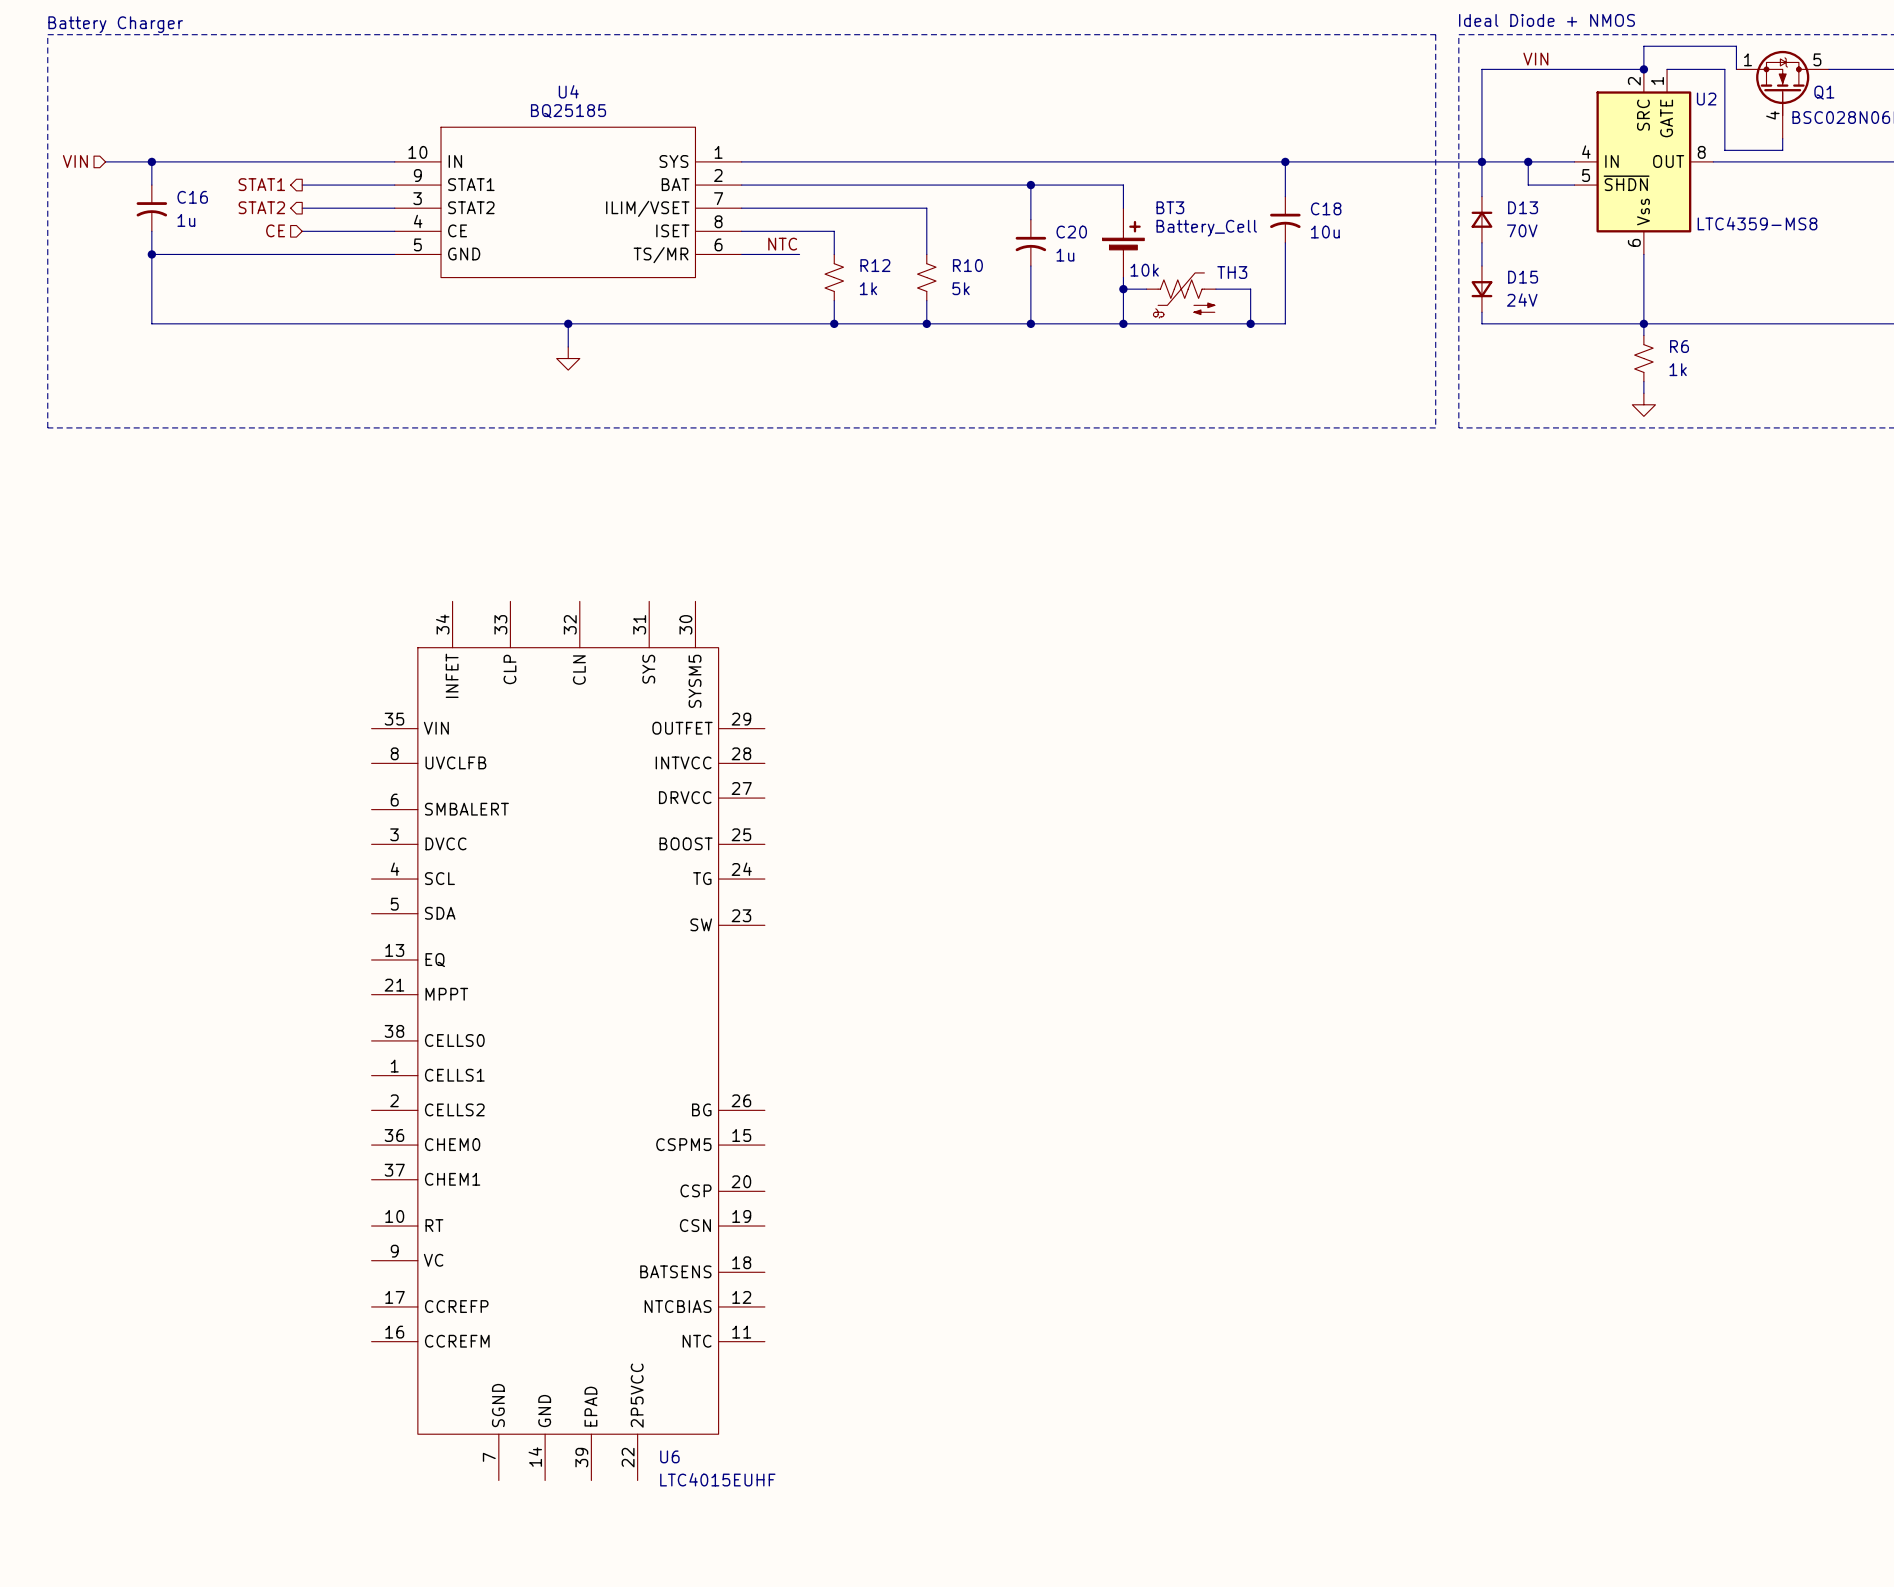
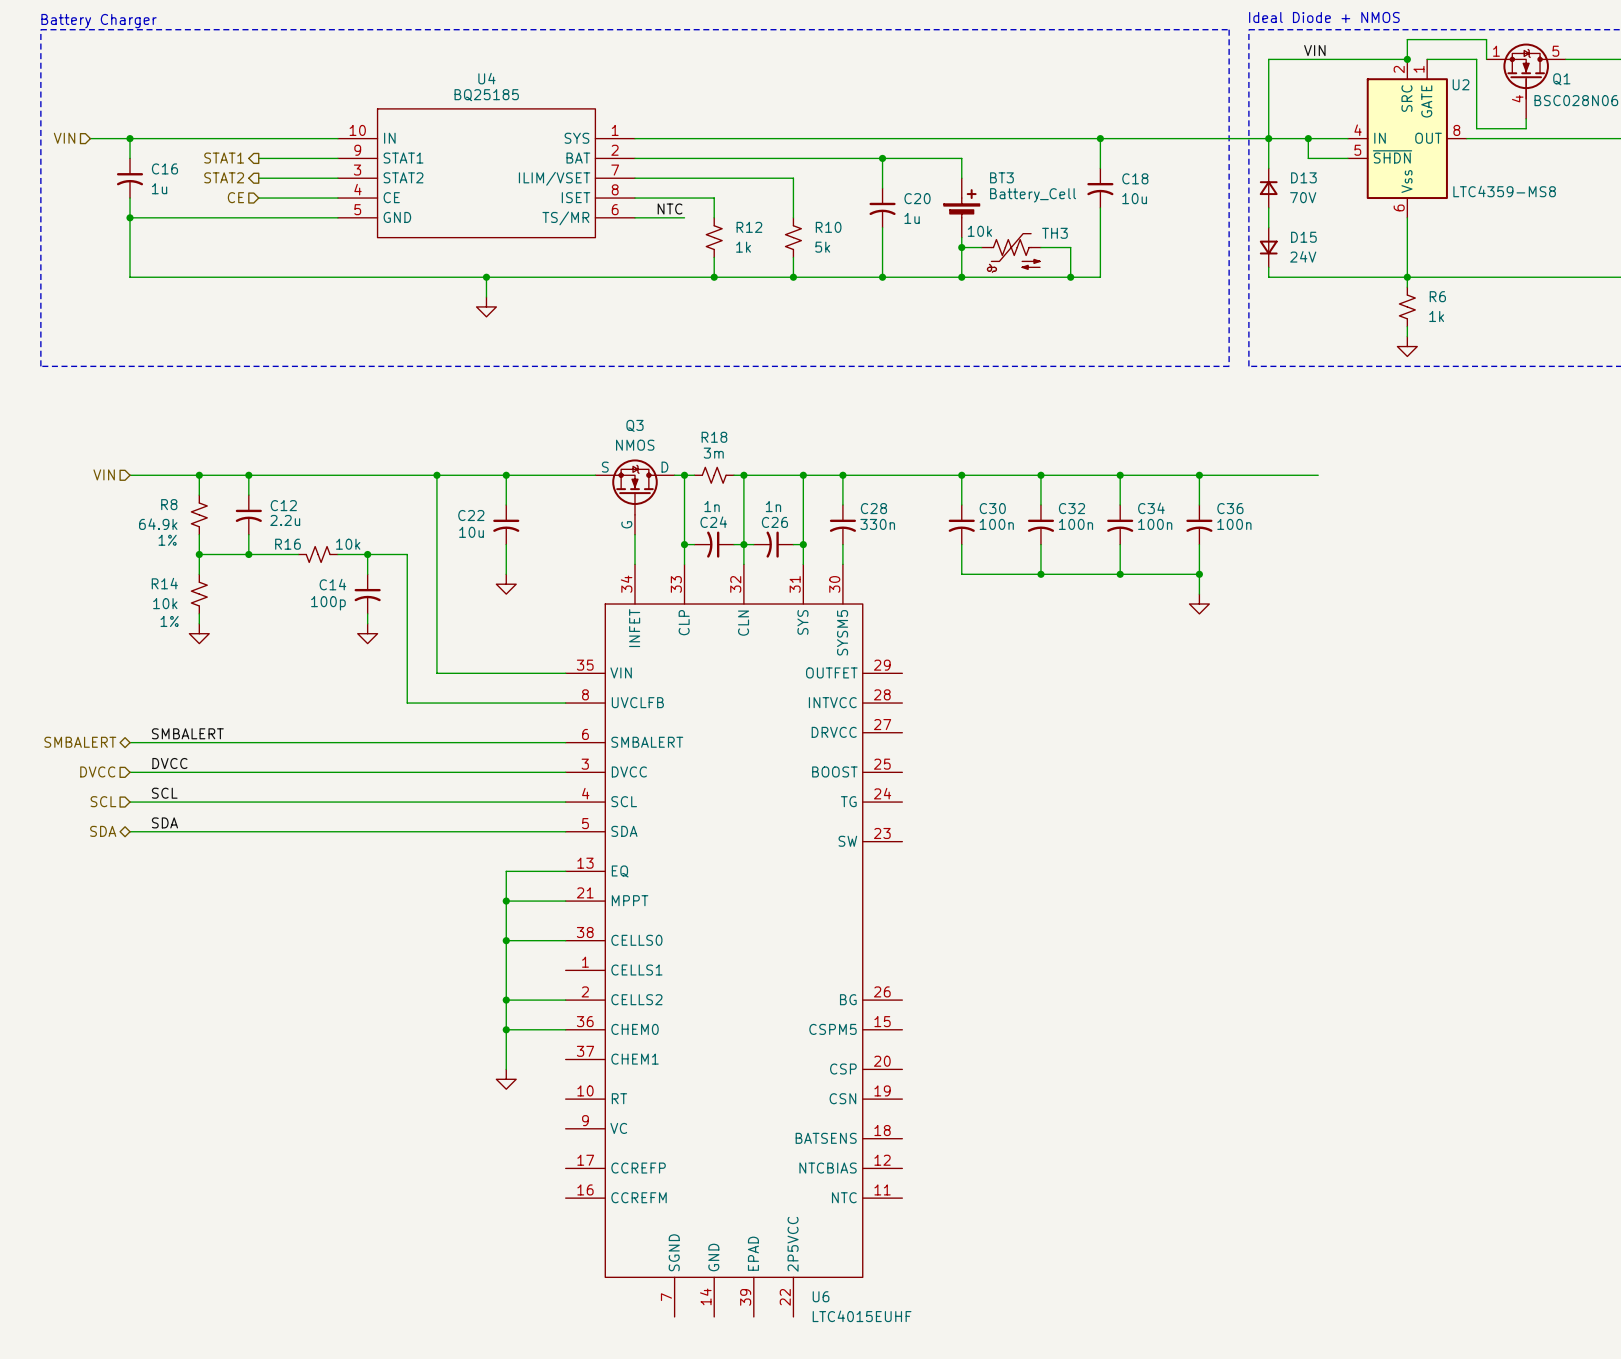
hierarchical label: none -> VIN (104, 474)
wire: none -> (130, 475) (595, 475)
wire: none -> (199, 475) (199, 495)
junction: none -> (199, 475)
wire: none -> (248, 475) (248, 495)
junction: none -> (248, 475)
wire: none -> (436, 475) (436, 673) (565, 673)
junction: none -> (436, 475)
wire: none -> (506, 475) (506, 504)
junction: none -> (506, 475)
wire: none -> (674, 475) (694, 475)
wire: none -> (684, 475) (684, 564)
junction: none -> (684, 475)
R18: none -> 3m (714, 475)
wire: none -> (734, 475) (1318, 475)
wire: none -> (743, 475) (743, 564)
junction: none -> (743, 475)
wire: none -> (803, 475) (803, 564)
junction: none -> (803, 475)
wire: none -> (842, 475) (842, 504)
junction: none -> (842, 475)
wire: none -> (961, 475) (961, 504)
junction: none -> (961, 475)
wire: none -> (1040, 475) (1040, 504)
junction: none -> (1040, 475)
wire: none -> (1120, 475) (1120, 504)
junction: none -> (1120, 475)
wire: none -> (1199, 475) (1199, 504)
junction: none -> (1199, 475)
Q3: none -> NMOS (634, 497)
R8: none -> 64.9k (199, 514)
C12: none -> 2.2u (248, 514)
C22: none -> 10u (506, 524)
C28: none -> 330n (842, 524)
C30: none -> 100n (961, 524)
C32: none -> 100n (1040, 524)
C34: none -> 100n (1120, 524)
C36: none -> 100n (1199, 524)
wire: none -> (199, 534) (199, 574)
wire: none -> (248, 534) (248, 554)
wire: none -> (634, 534) (634, 564)
wire: none -> (506, 544) (506, 574)
wire: none -> (684, 544) (694, 544)
junction: none -> (684, 544)
C24: none -> 1n (714, 544)
wire: none -> (734, 544) (753, 544)
junction: none -> (743, 544)
C26: none -> 1n (773, 544)
wire: none -> (793, 544) (803, 544)
junction: none -> (803, 544)
wire: none -> (842, 544) (842, 564)
wire: none -> (961, 544) (961, 574) (1199, 574)
wire: none -> (1040, 544) (1040, 574)
wire: none -> (1120, 544) (1120, 574)
wire: none -> (1199, 544) (1199, 594)
wire: none -> (199, 554) (298, 554)
junction: none -> (199, 554)
junction: none -> (248, 554)
R16: none -> 10k (318, 554)
wire: none -> (337, 554) (407, 554) (407, 703) (565, 703)
wire: none -> (367, 554) (367, 574)
junction: none -> (367, 554)
junction: none -> (1040, 574)
junction: none -> (1120, 574)
junction: none -> (1199, 574)
power symbol: none -> (506, 584)
R14: none -> 10k (199, 594)
C14: none -> 100p (367, 594)
power symbol: none -> (1199, 604)
wire: none -> (199, 613) (199, 623)
wire: none -> (367, 613) (367, 623)
power symbol: none -> (199, 633)
power symbol: none -> (367, 633)
label: none -> SMBALERT (187, 733)
hierarchical label: none -> SMBALERT (80, 742)
wire: none -> (130, 742) (565, 742)
label: none -> DVCC (169, 763)
hierarchical label: none -> DVCC (97, 771)
wire: none -> (130, 772) (565, 772)
label: none -> SCL (164, 793)
hierarchical label: none -> SCL (103, 801)
wire: none -> (130, 802) (565, 802)
label: none -> SDA (164, 822)
hierarchical label: none -> SDA (103, 831)
wire: none -> (130, 831) (565, 831)
wire: none -> (565, 871) (506, 871) (506, 1069)
U6 position: (568, 1040) -> (734, 940)
wire: none -> (506, 901) (565, 901)
junction: none -> (506, 901)
wire: none -> (506, 940) (565, 940)
junction: none -> (506, 940)
wire: none -> (506, 1000) (565, 1000)
junction: none -> (506, 1000)
wire: none -> (506, 1029) (565, 1029)
junction: none -> (506, 1029)
power symbol: none -> (506, 1079)

